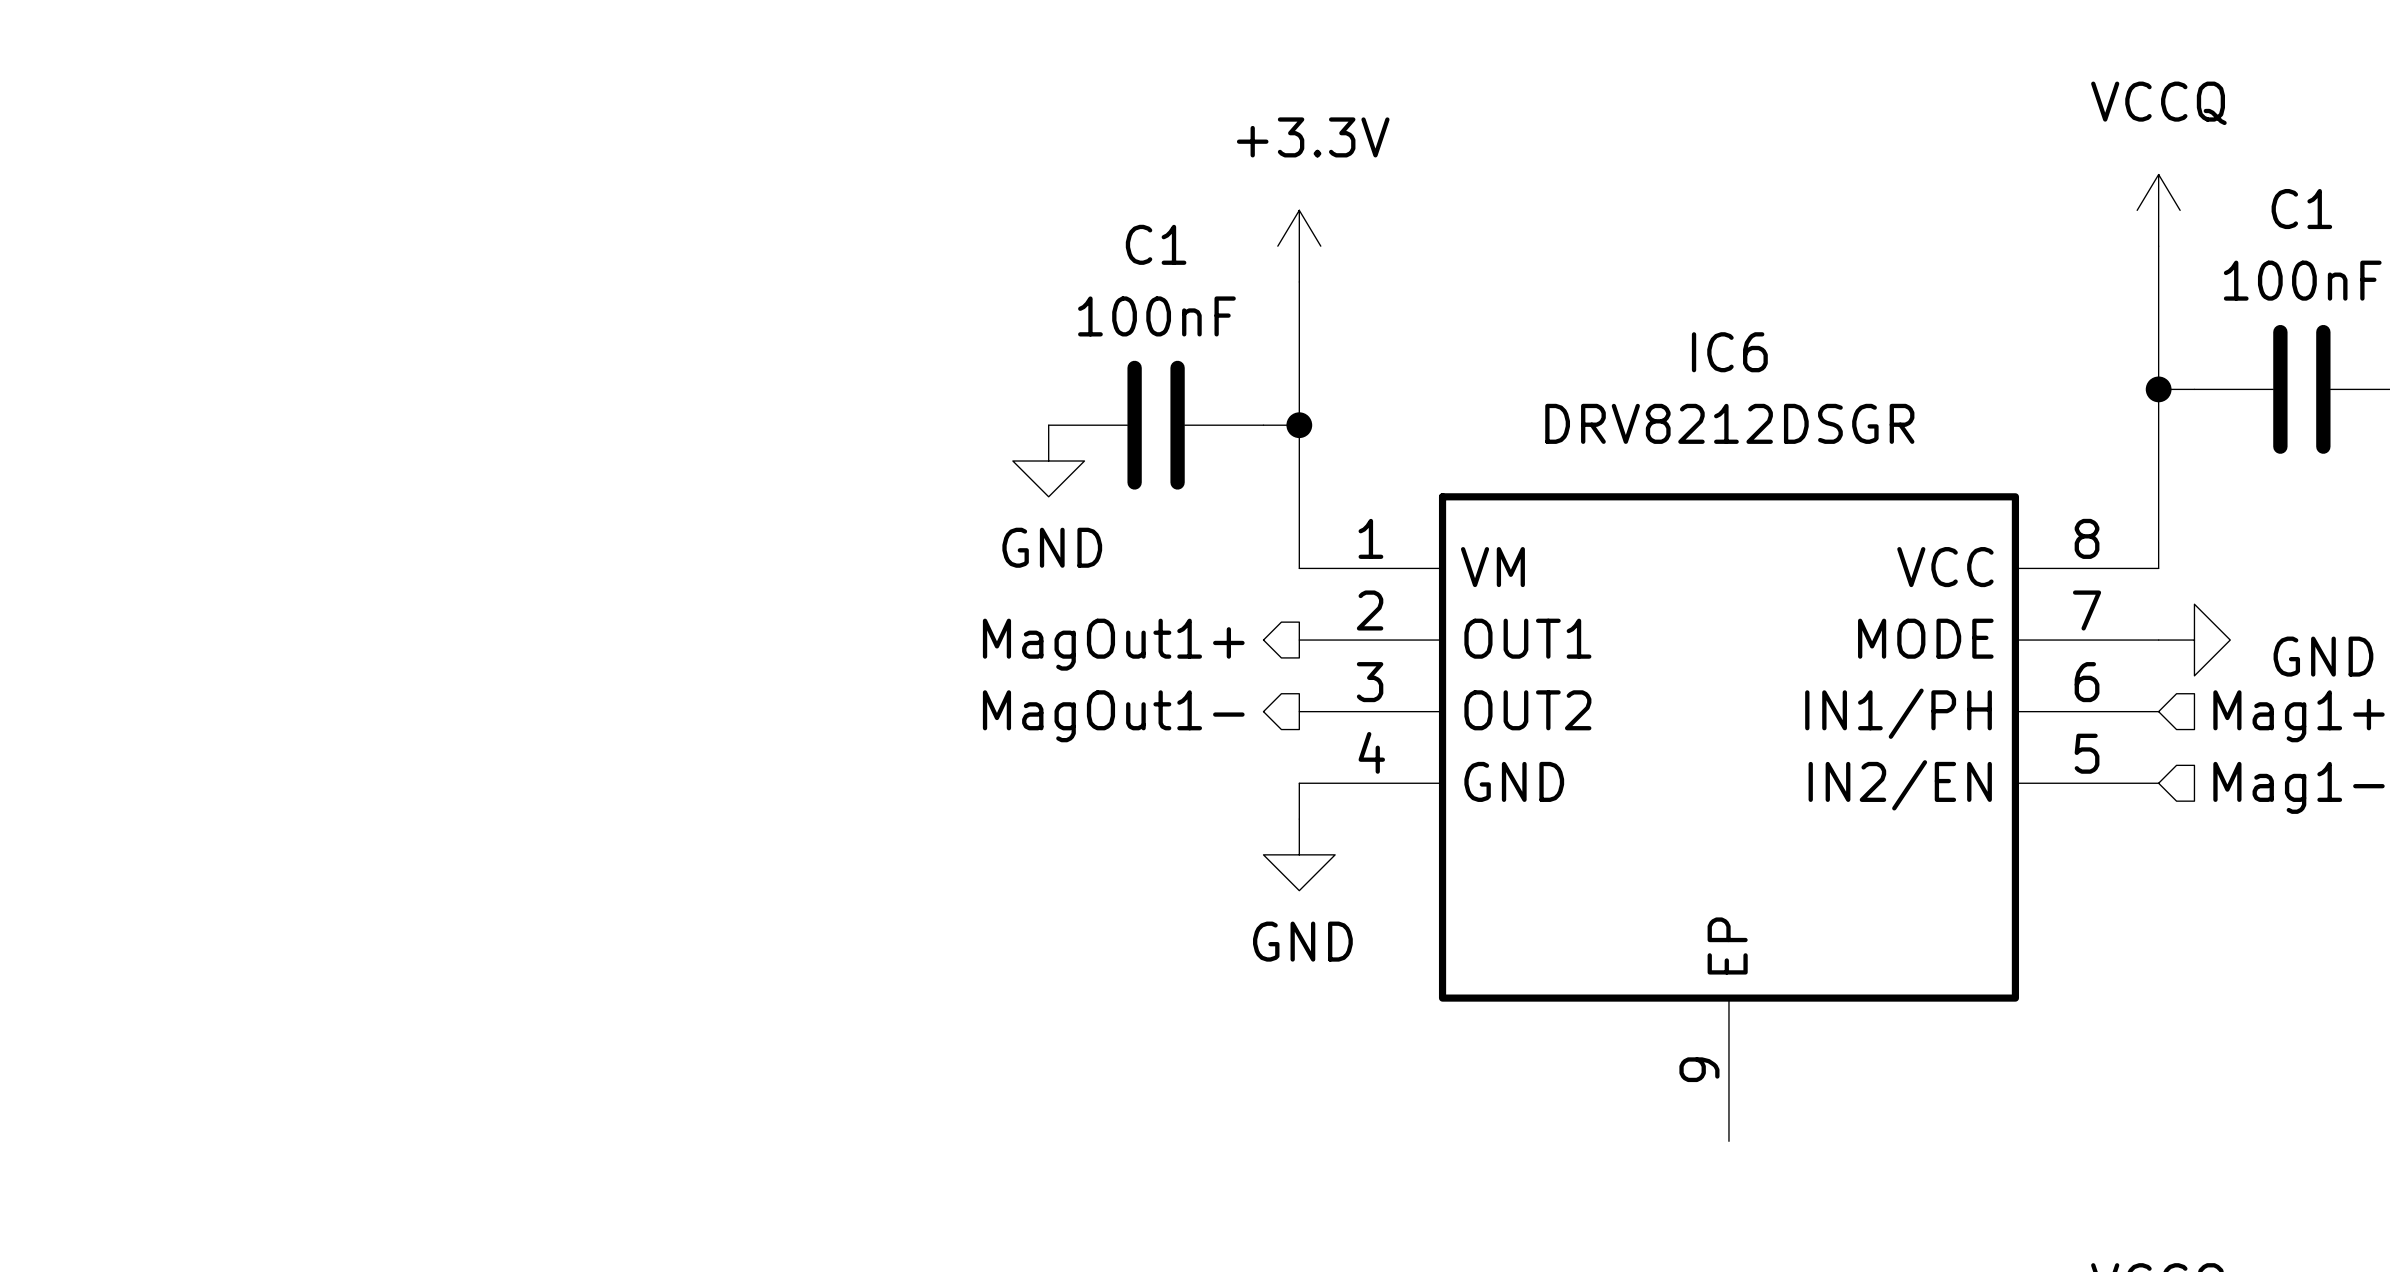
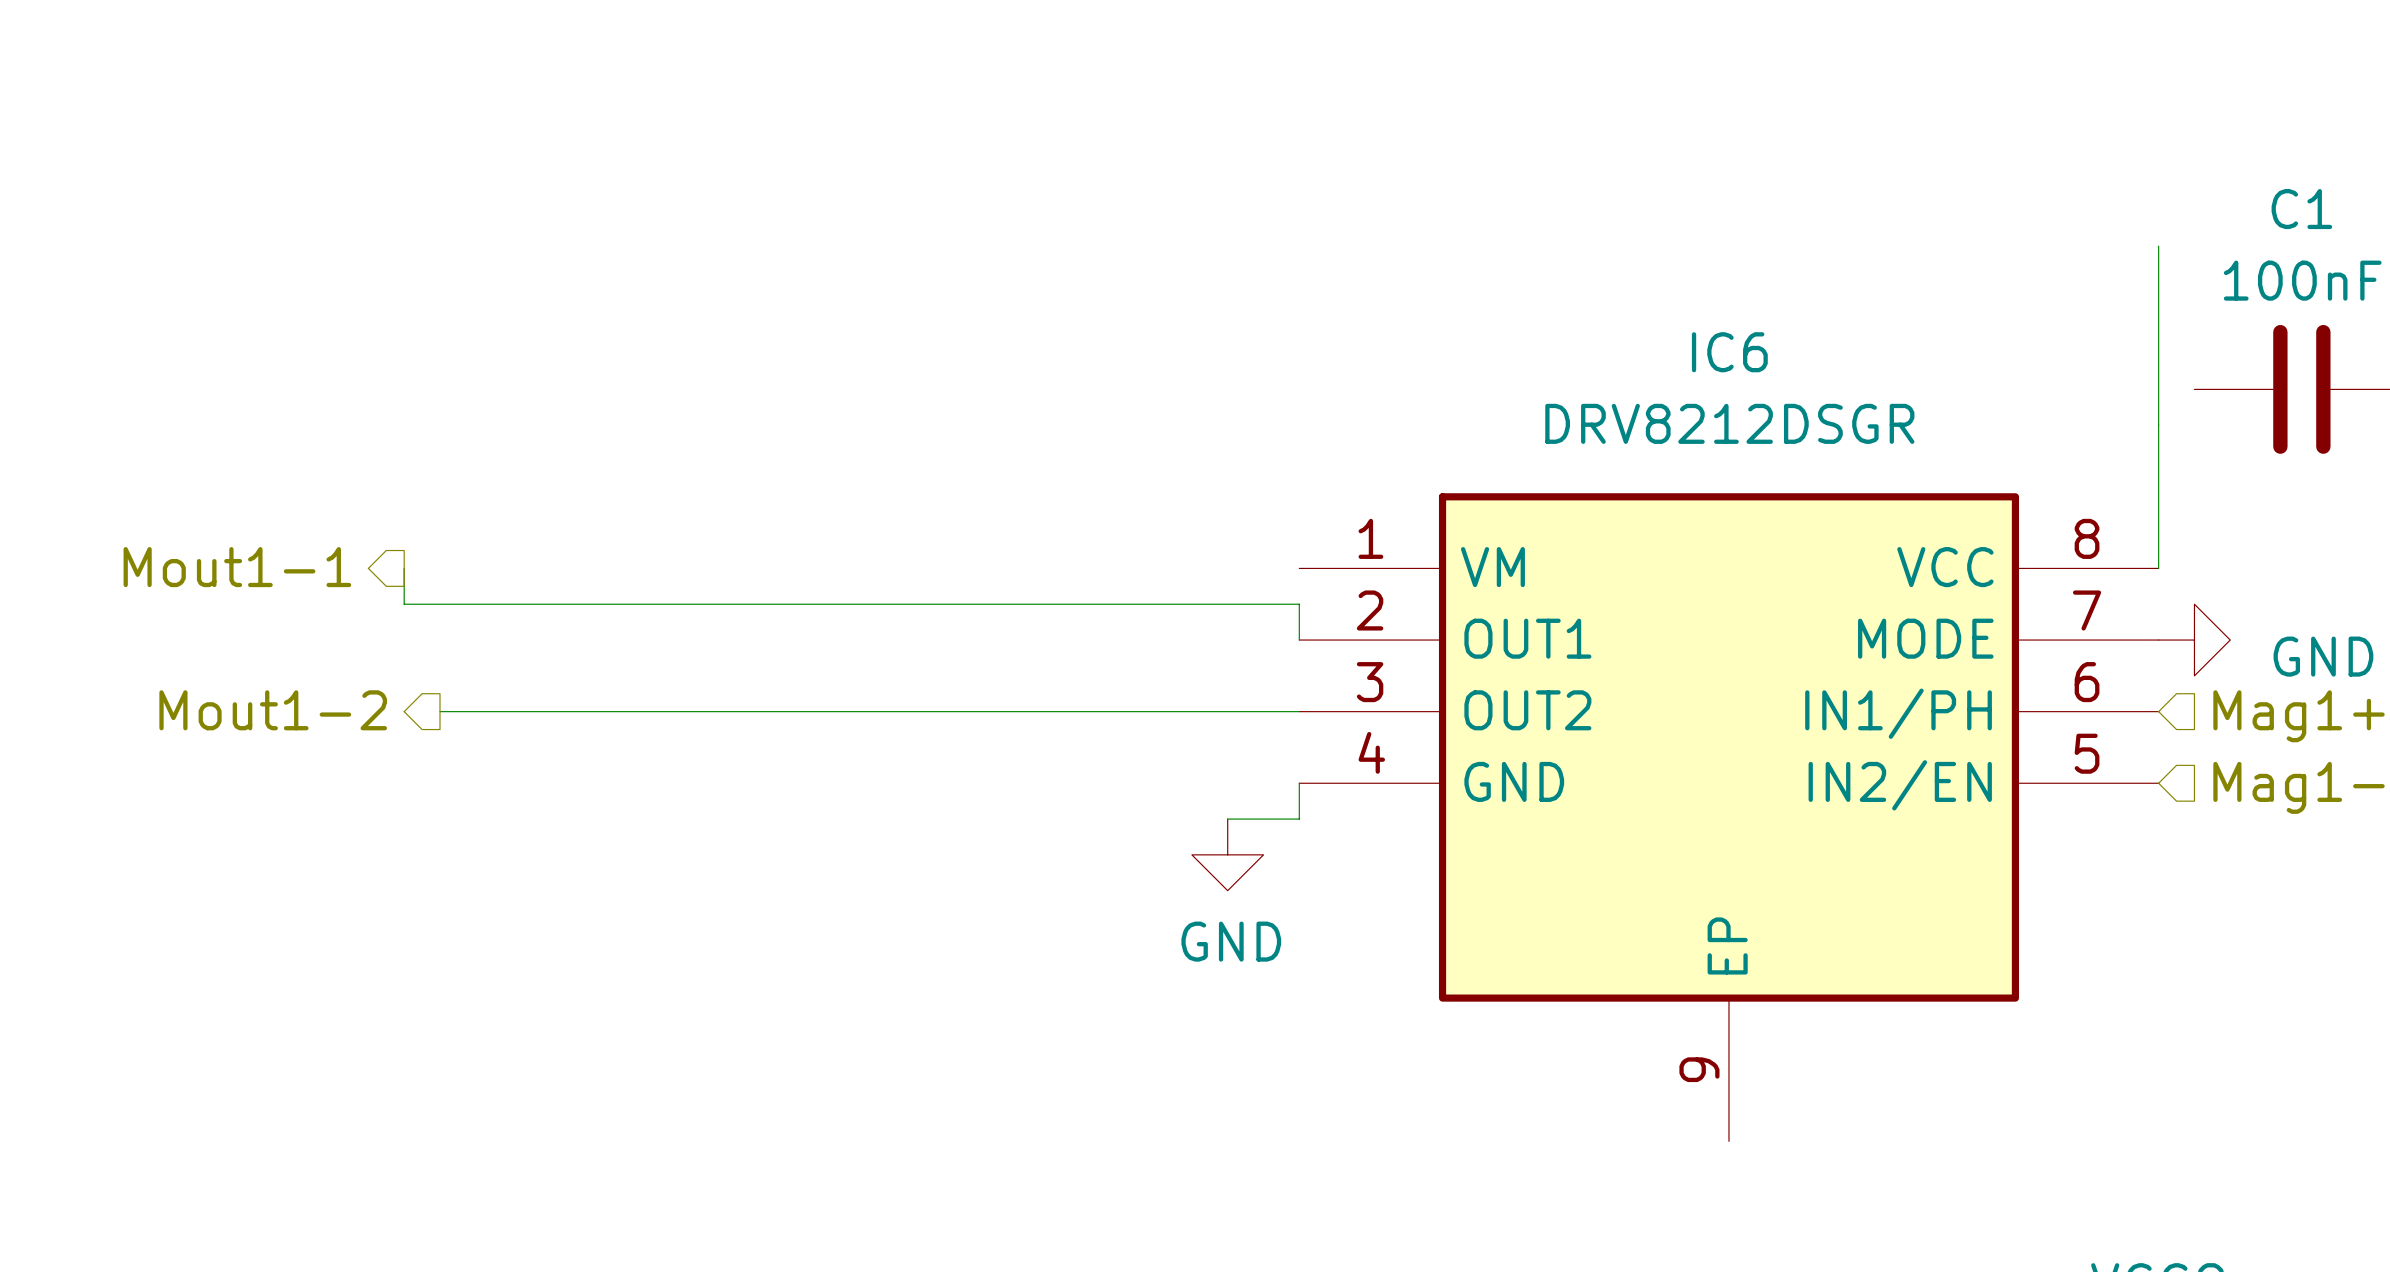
power symbol: VCCQ (2158, 210) -> none
power symbol: +3.3V (1299, 246) -> none
wire: (1299, 281) (1299, 568) -> none
wire: (2158, 389) (2194, 389) -> none
junction: (2158, 389) -> none
C1: 100nF (1156, 425) -> none
wire: (1263, 425) (1299, 425) -> none
junction: (1299, 425) -> none
power symbol: GND (1048, 461) -> none
hierarchical label: none -> Mout1-1 (237, 567)
wire: none -> (404, 568) (404, 604) (1299, 604) (1299, 640)
hierarchical label: MagOut1+ (1113, 644) -> none
hierarchical label: none -> Mout1-2 (273, 710)
wire: none -> (439, 711) (1299, 711)
hierarchical label: MagOut1- (1113, 716) -> none
wire: none -> (1227, 819) (1299, 819)
power symbol position: GND (1299, 854) -> GND (1227, 854)

